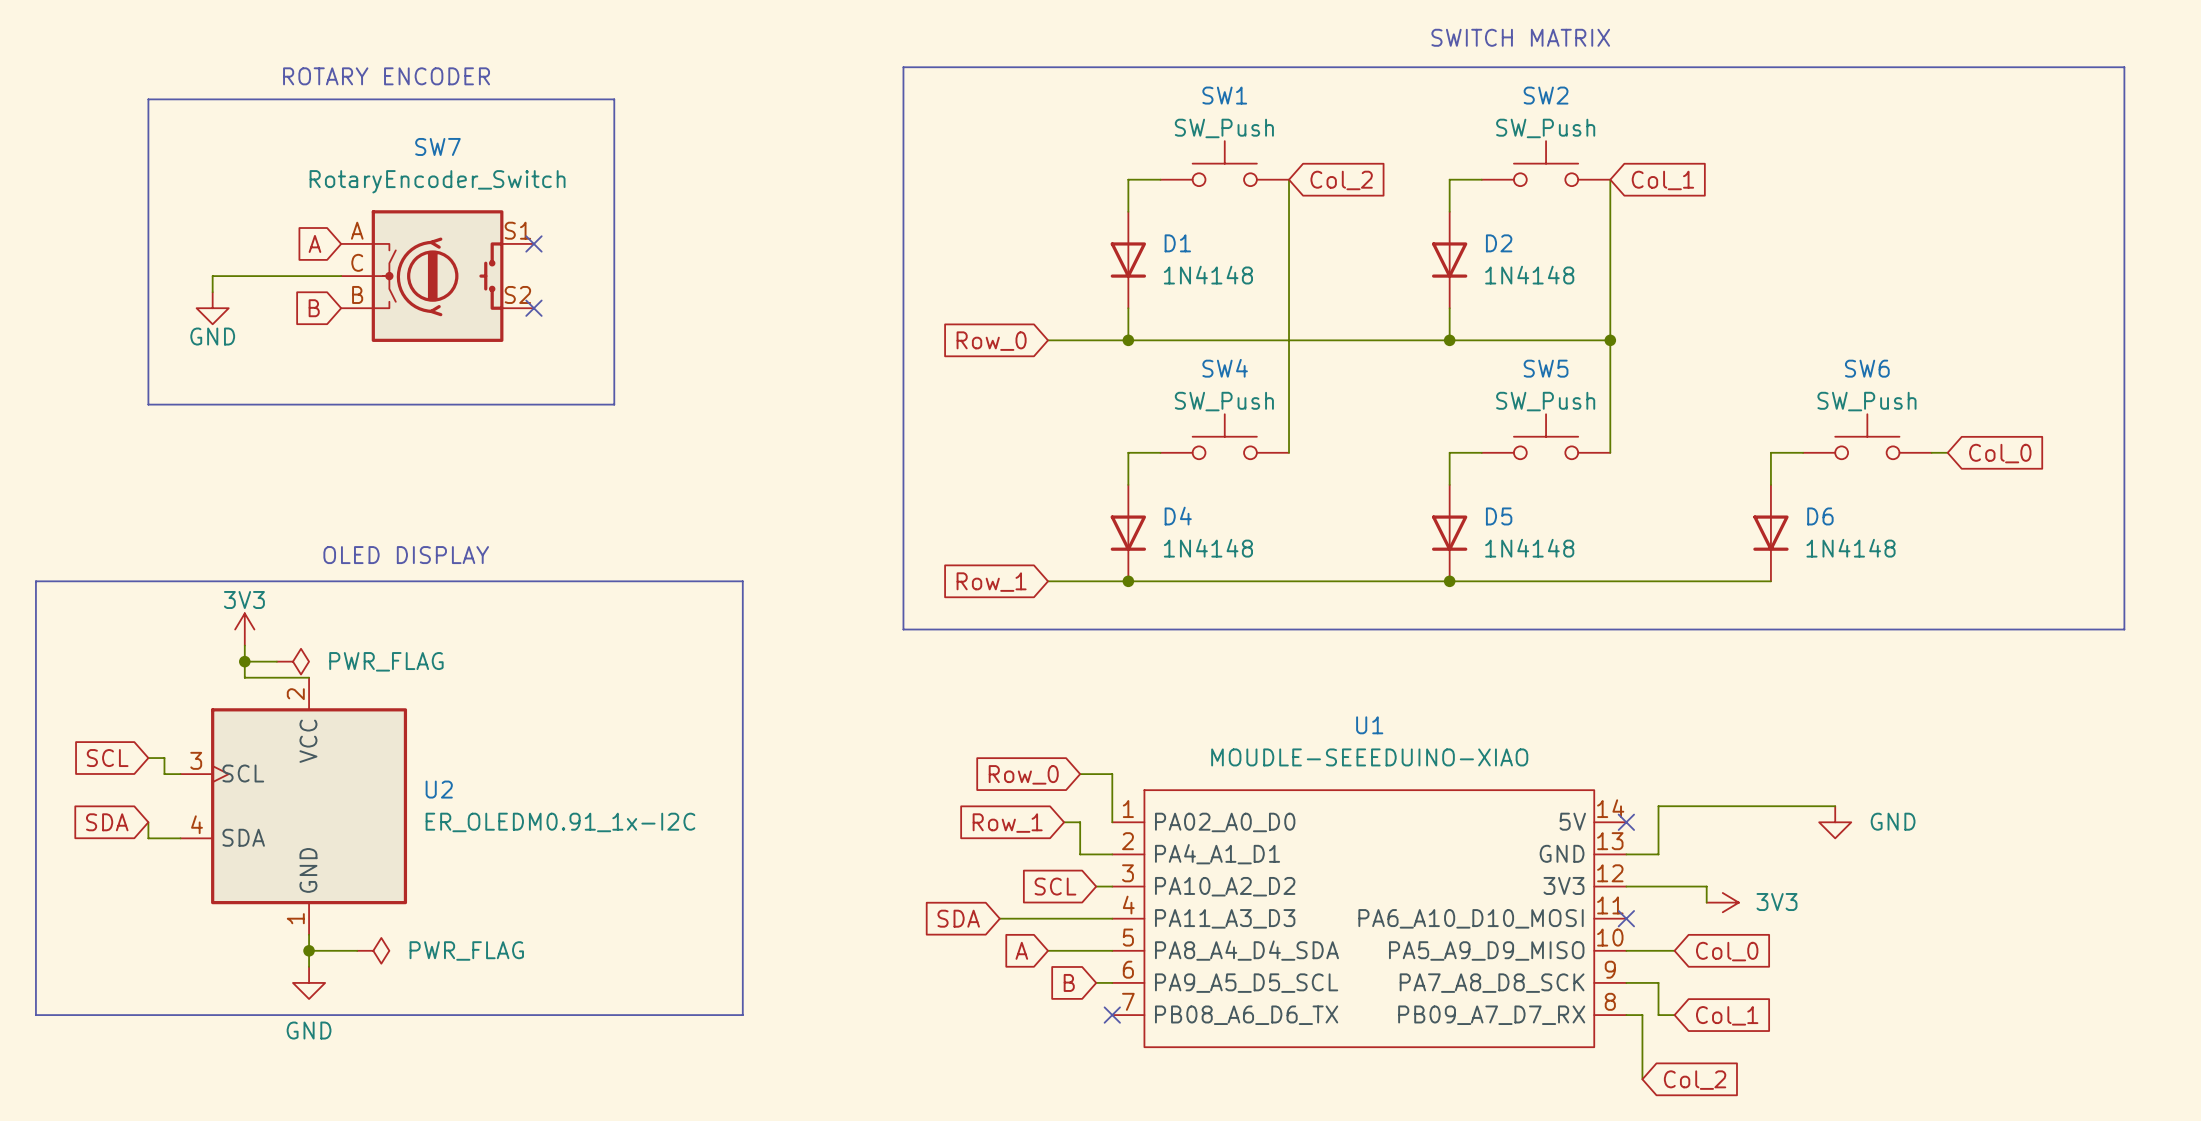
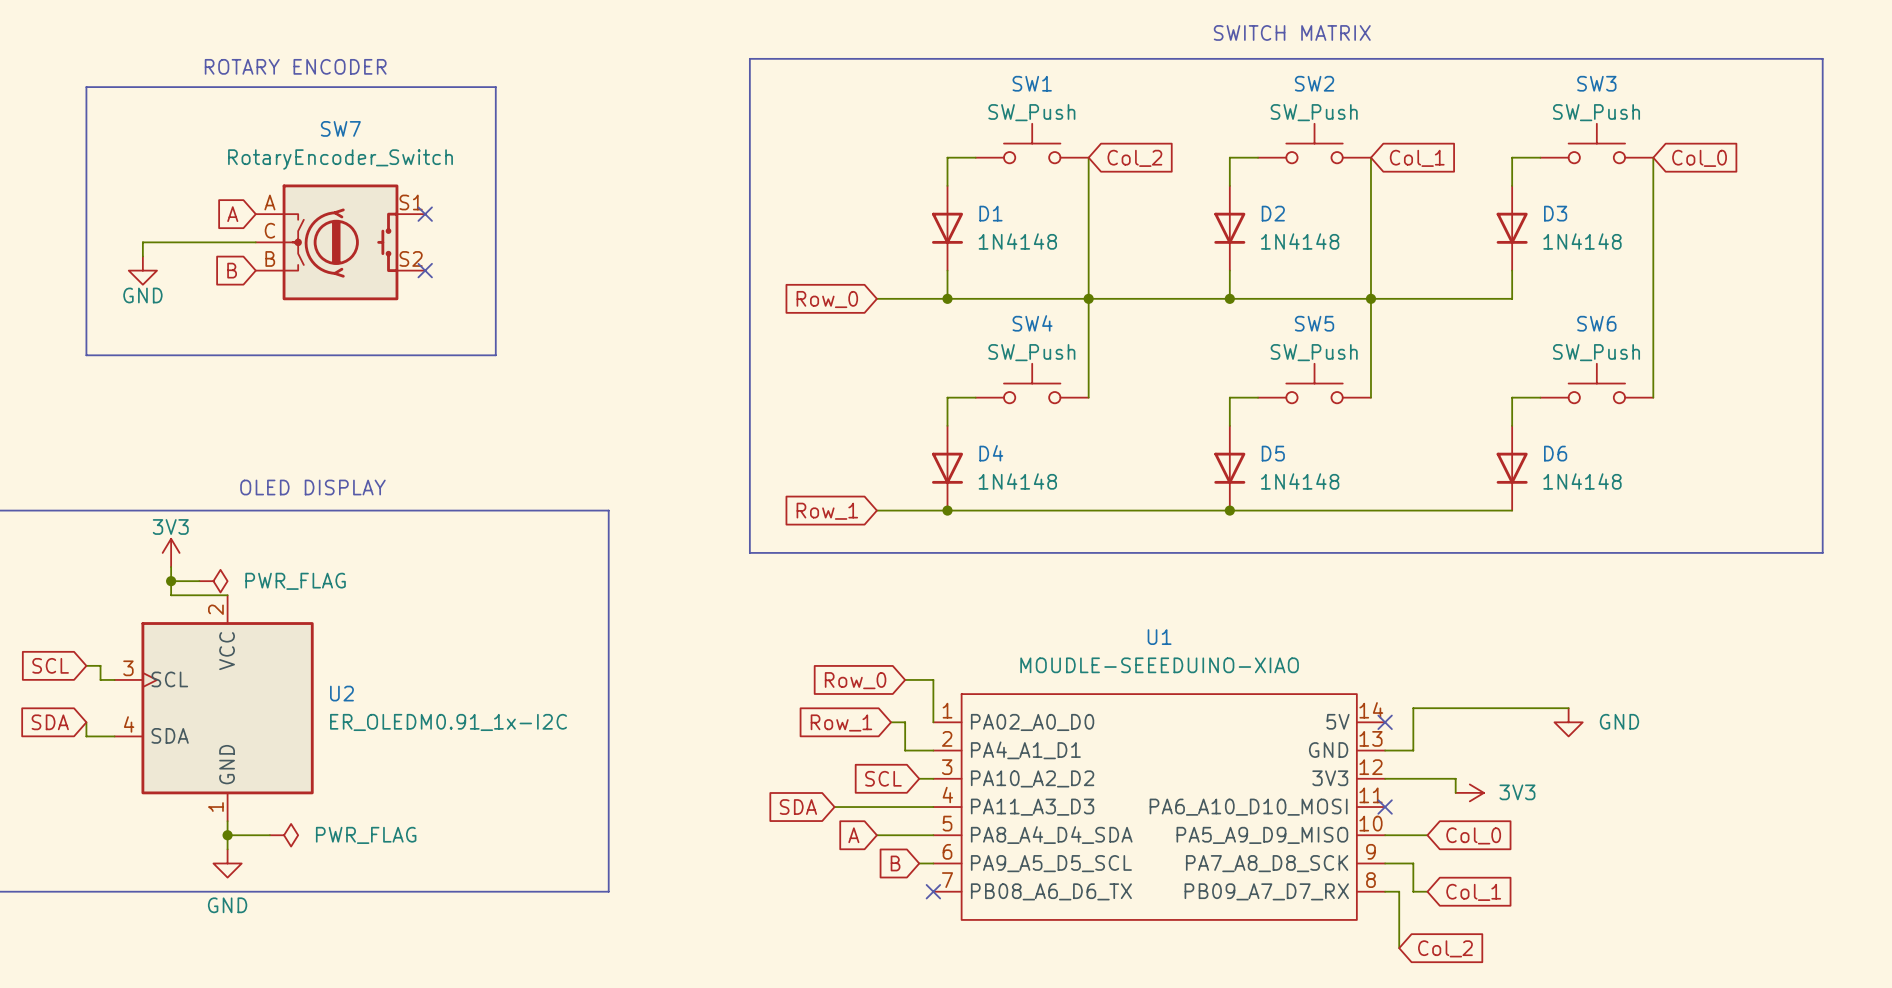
SW3: none -> SW_Push (1596, 143)
wire: none -> (1540, 157) (1512, 157) (1512, 185)
D3: none -> 1N4148 (1512, 228)
wire: none -> (1512, 270) (1512, 298) (1370, 298)
junction: none -> (1088, 298)
wire: (1931, 452) (1947, 452) -> (1653, 397) (1653, 157)
global label position: Col_0 (2000, 453) -> Col_0 (1699, 158)

